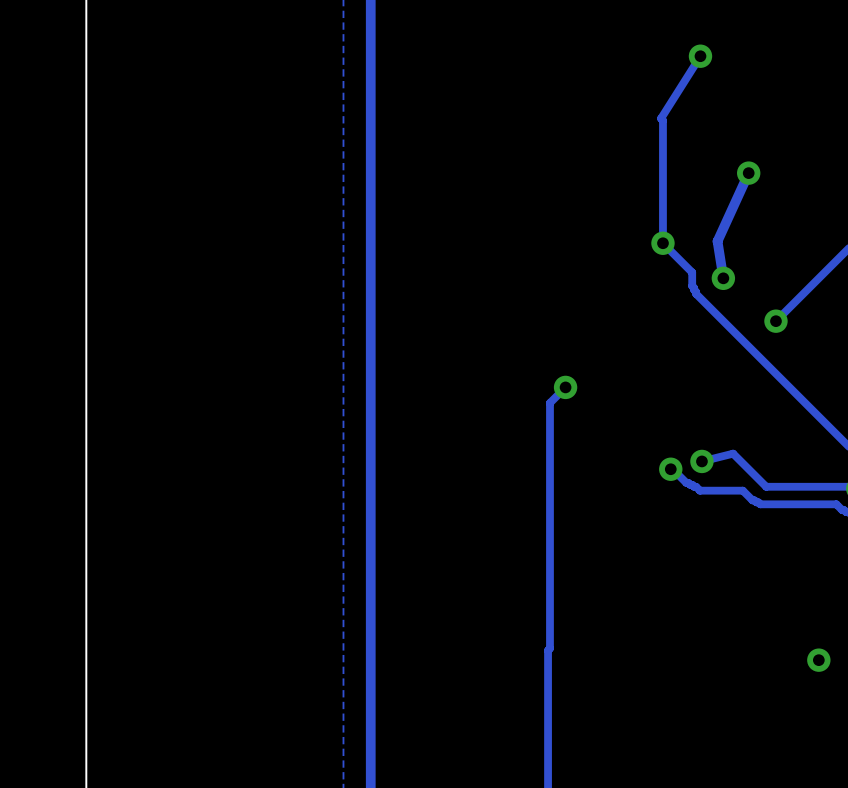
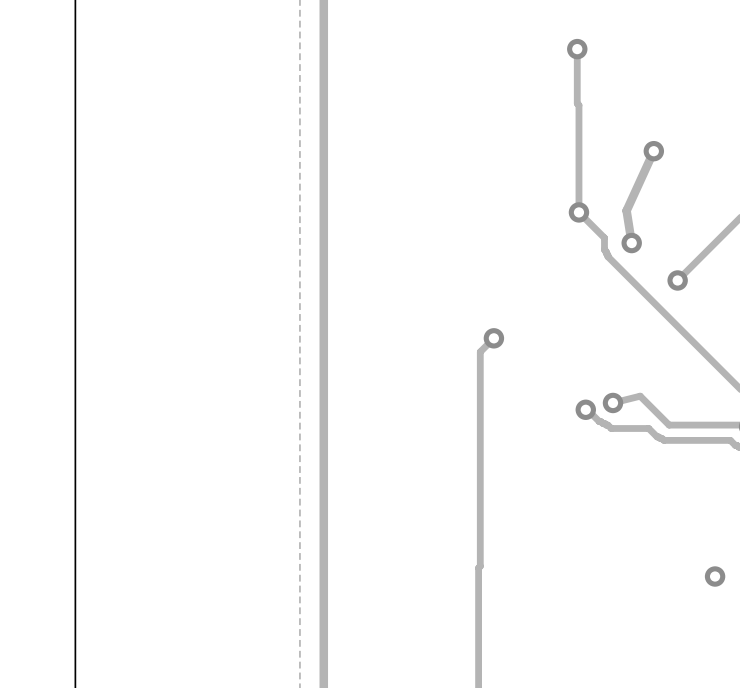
track: (700, 56) (661, 118) -> (577, 49) (577, 103)
via position: (700, 56) -> (577, 49)

